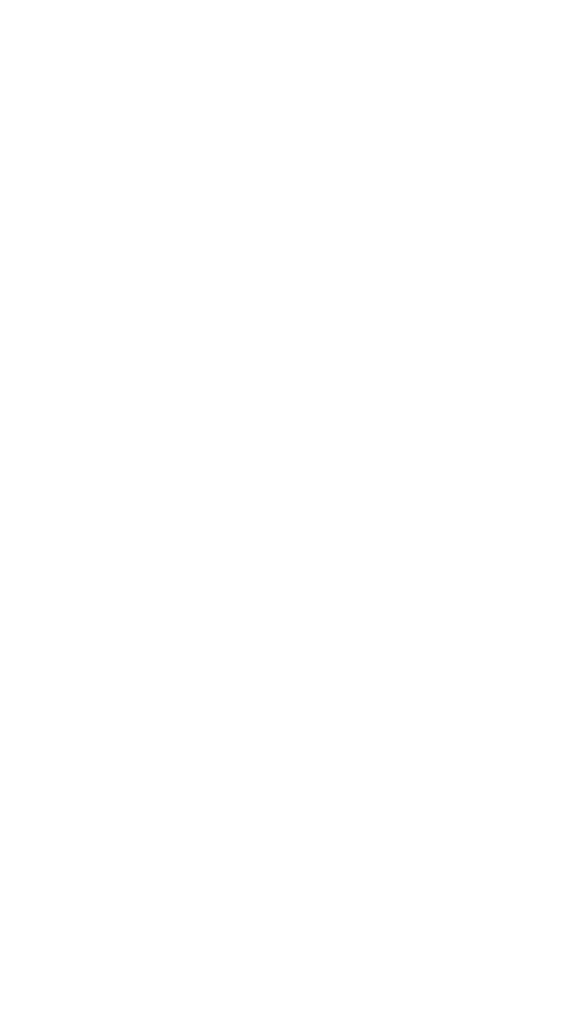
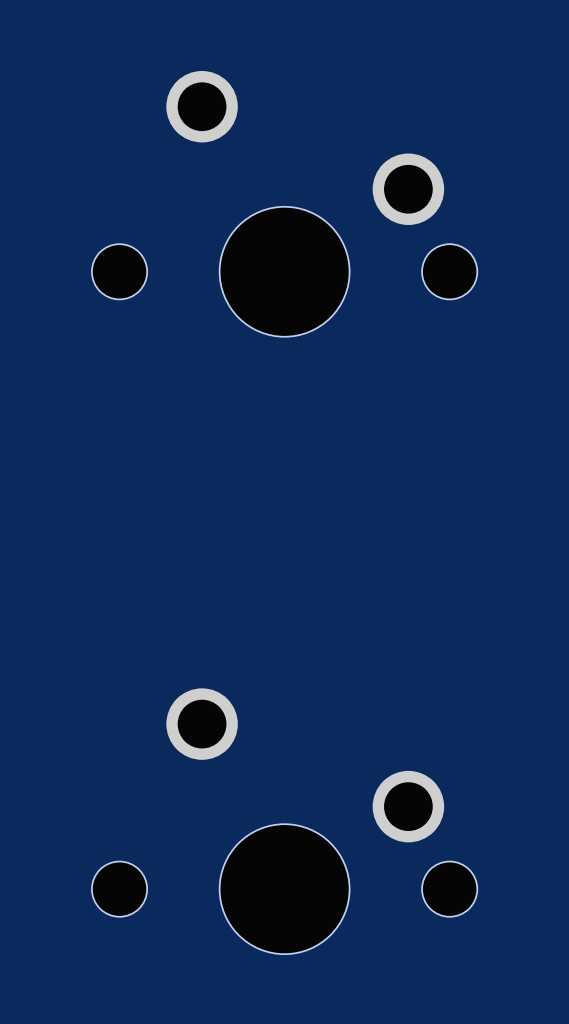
part: none -> (284, 203)
part: none -> (284, 821)

